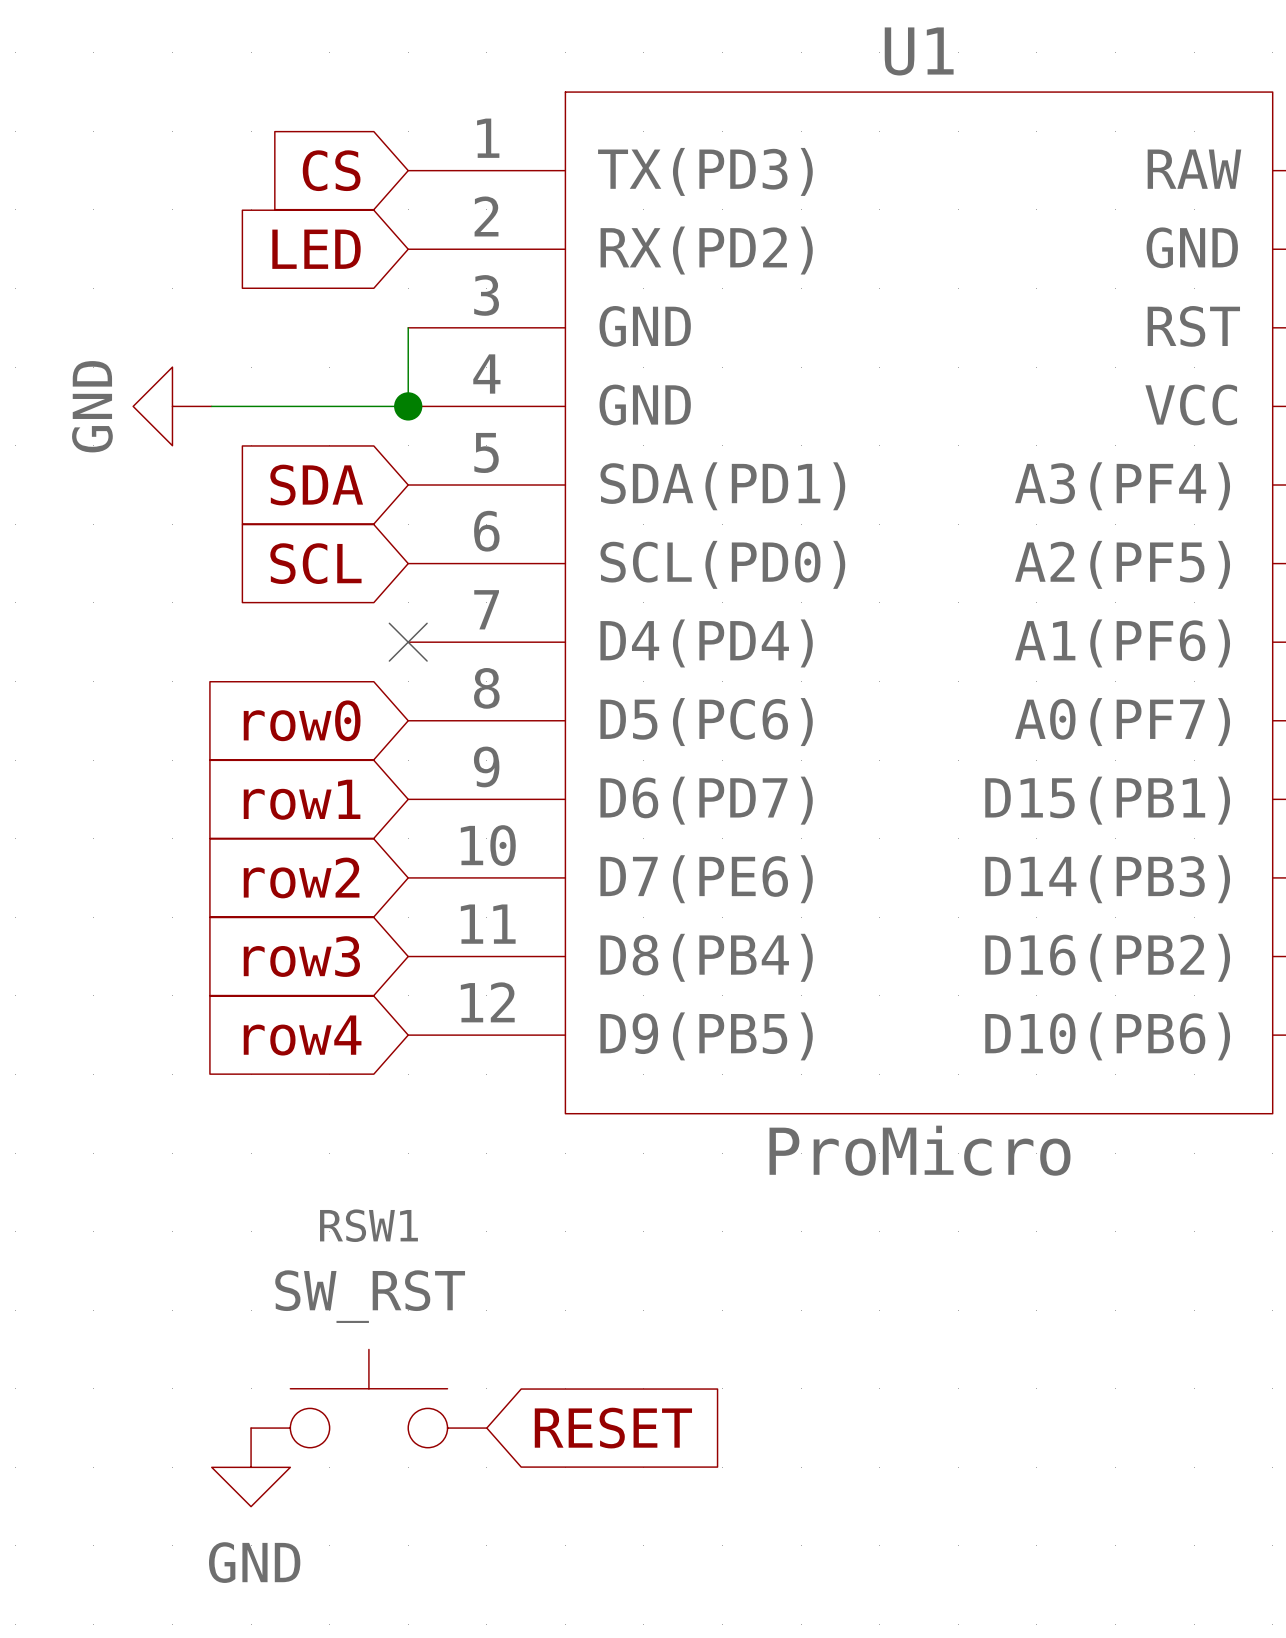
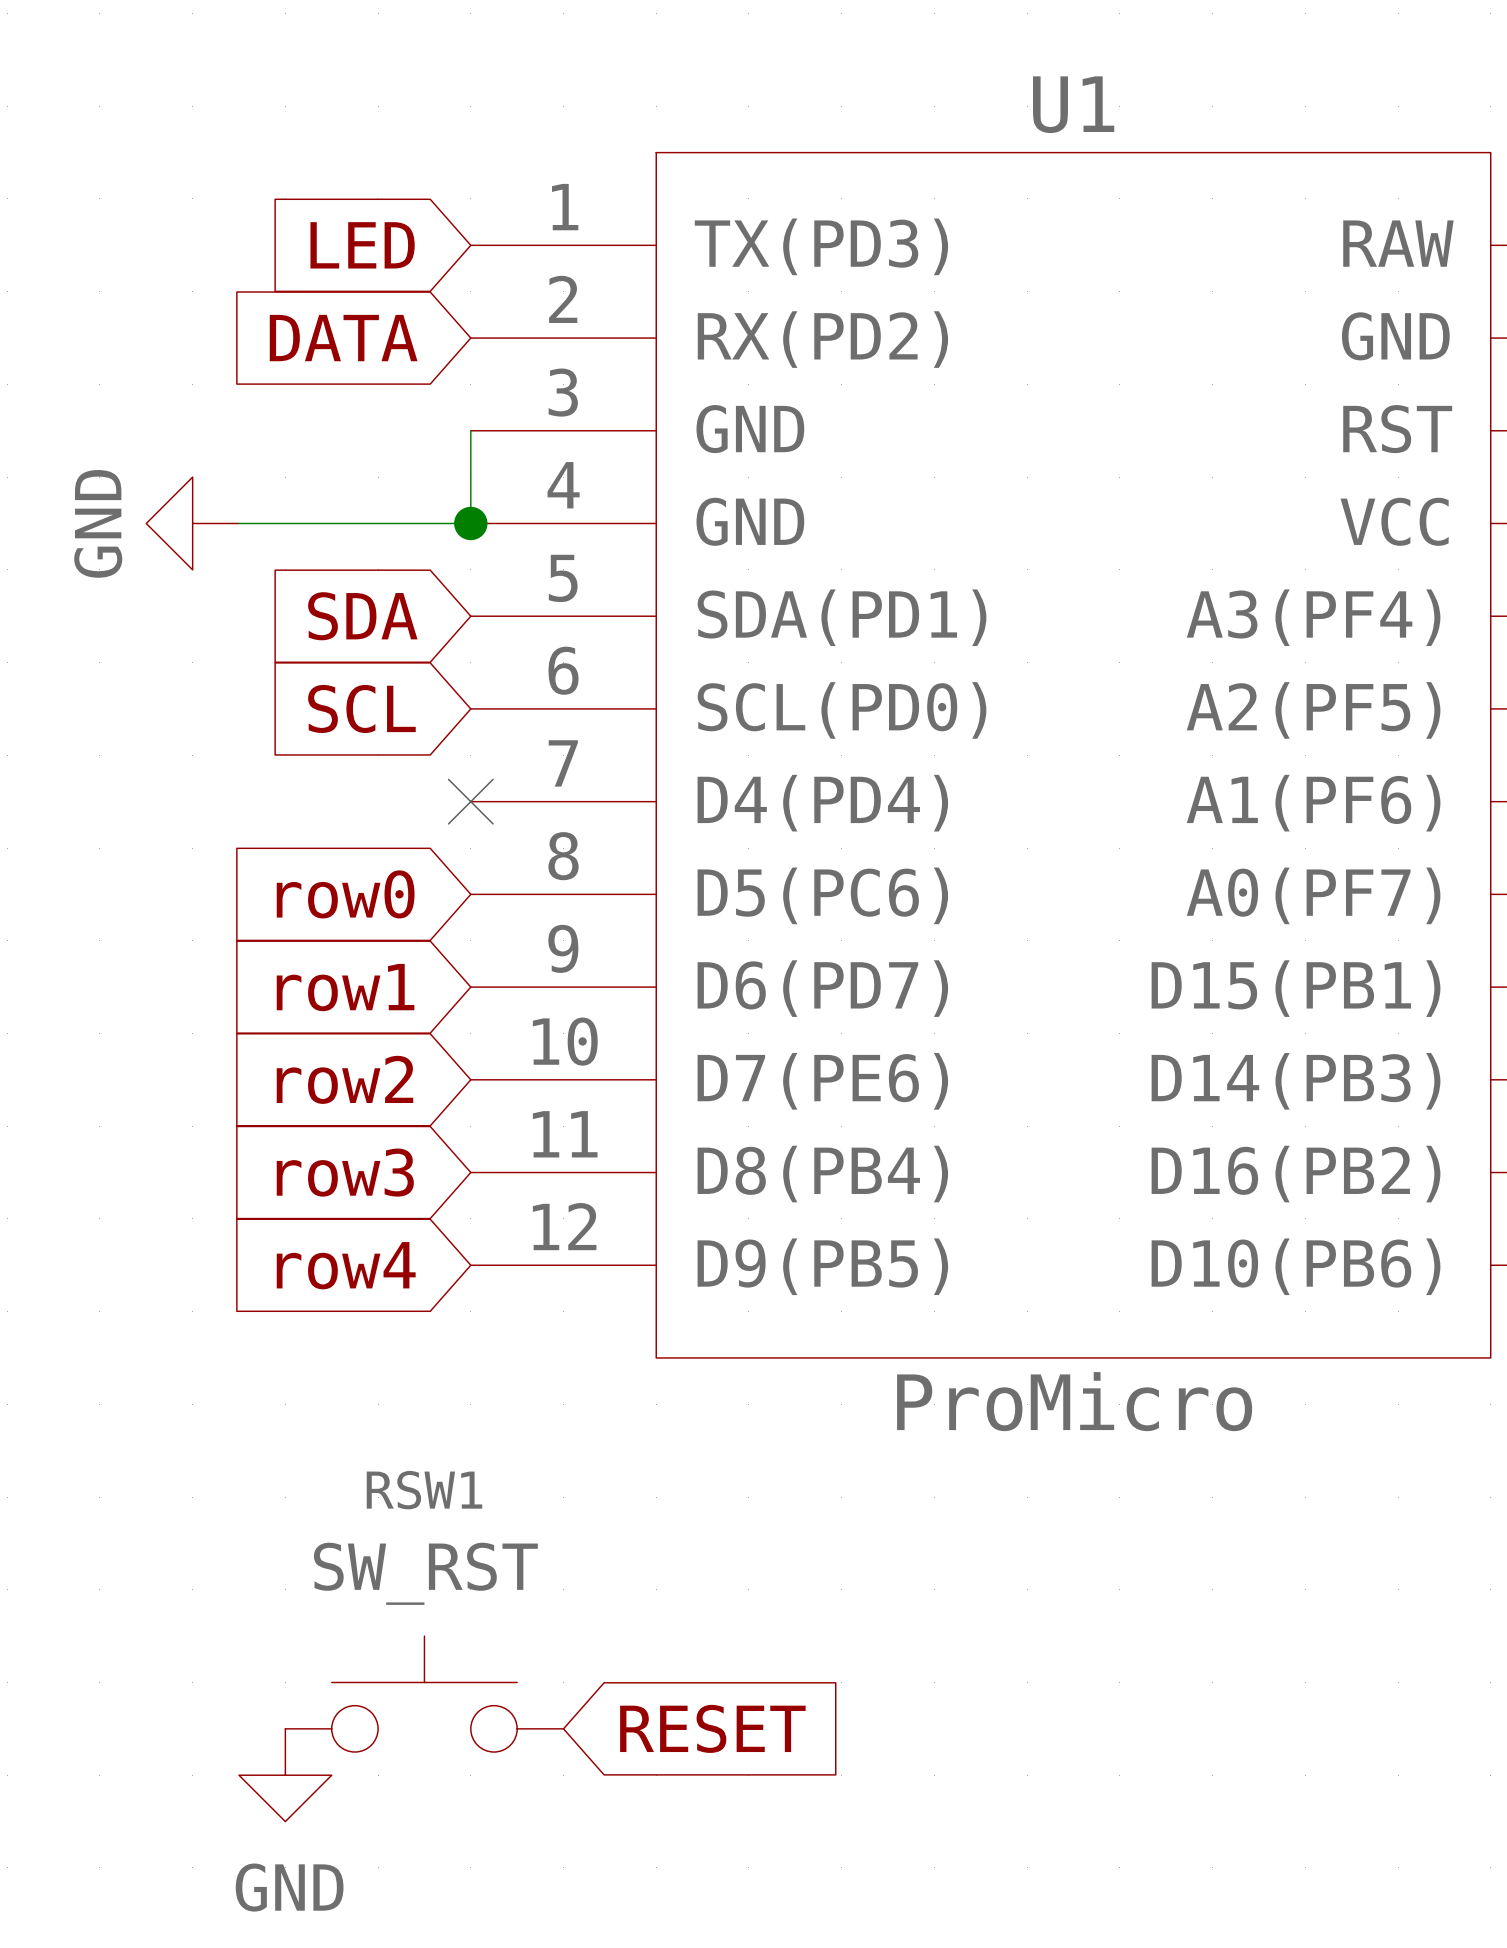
global label: CS (331, 170) -> LED (362, 245)
global label: LED (316, 249) -> DATA (343, 338)

